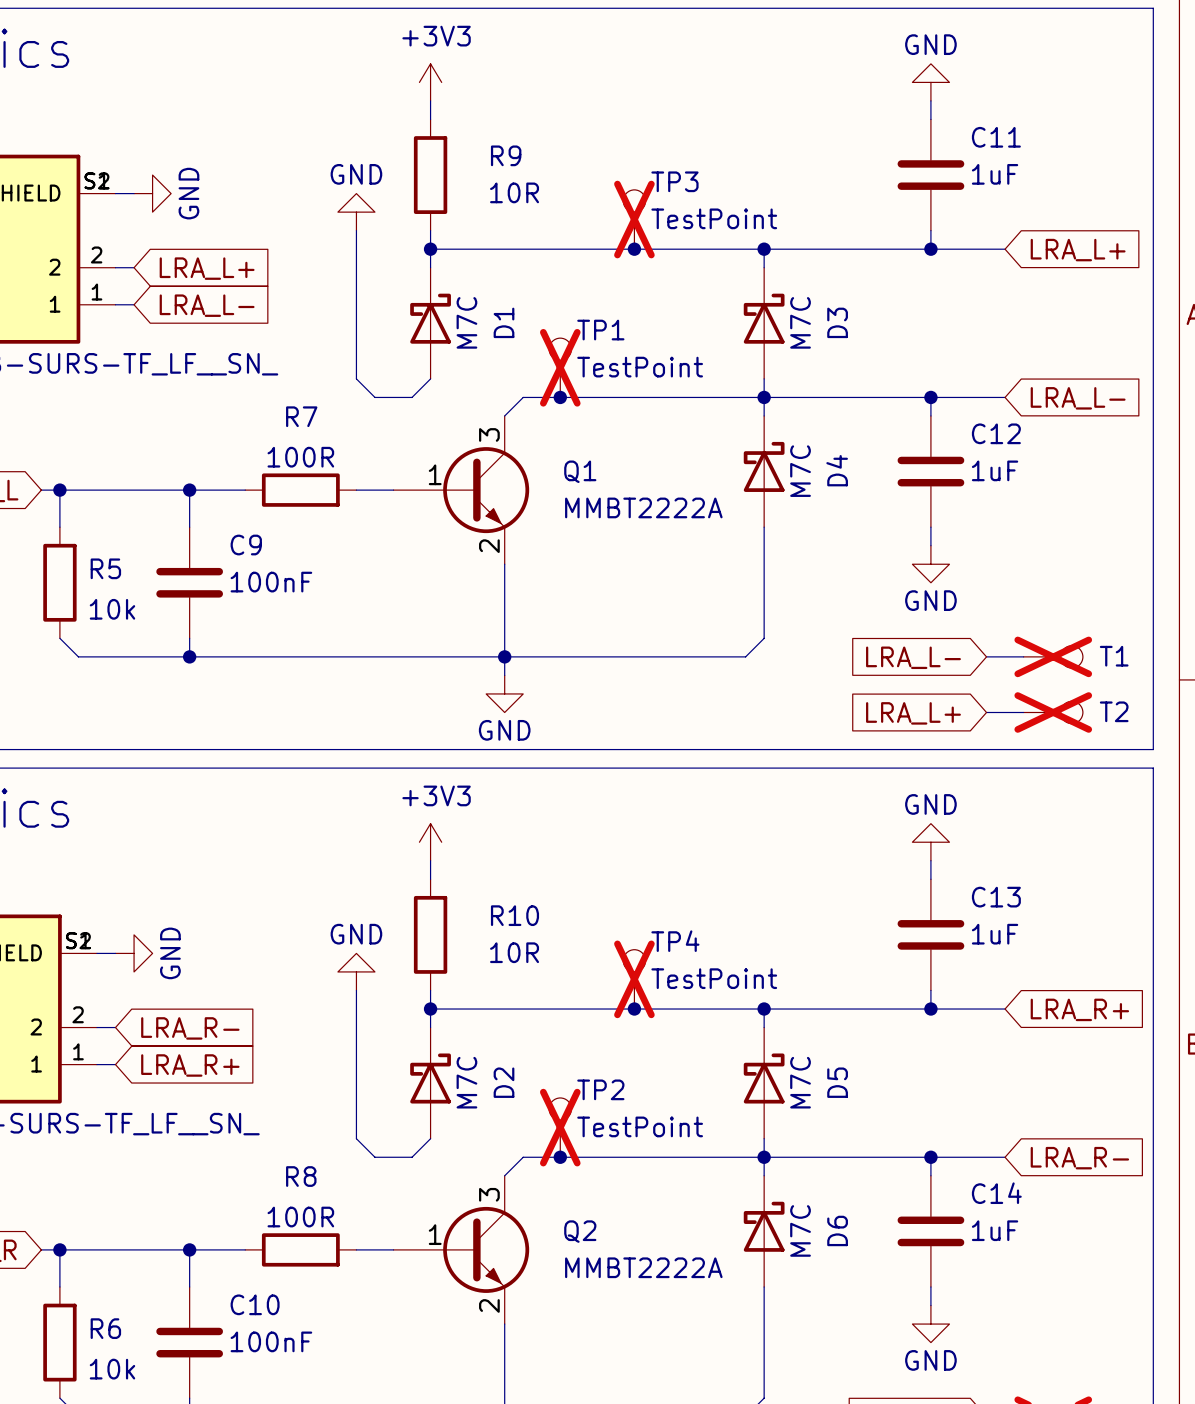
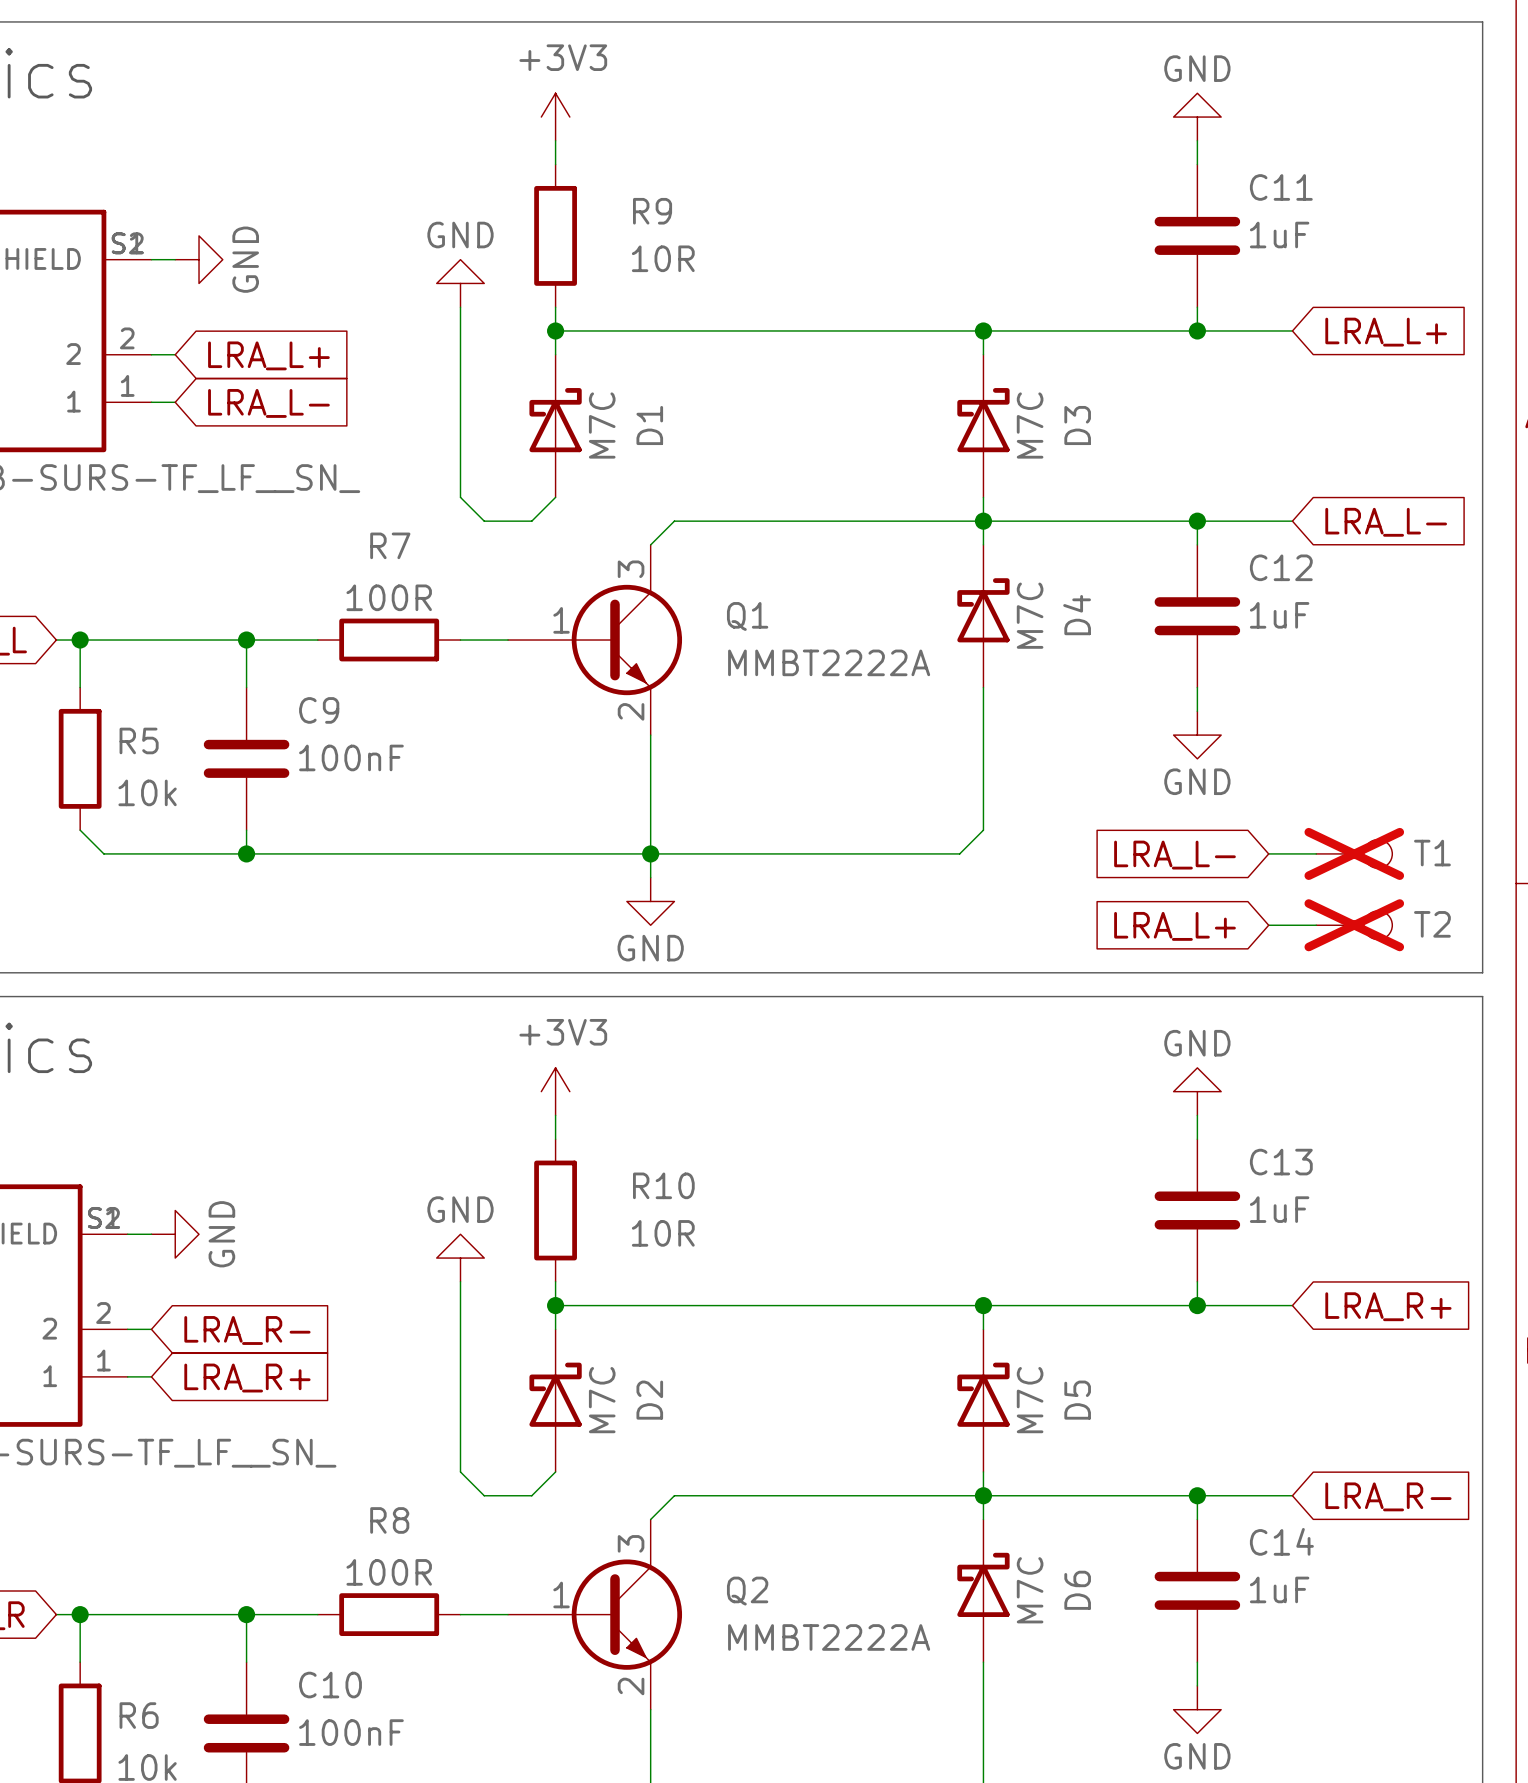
TP3: TestPoint (634, 219) -> none
junction: (634, 249) -> none
TP1: TestPoint (560, 367) -> none
junction: (560, 397) -> none
TP4: TestPoint (634, 979) -> none
junction: (634, 1009) -> none
TP2: TestPoint (560, 1127) -> none
junction: (560, 1157) -> none

